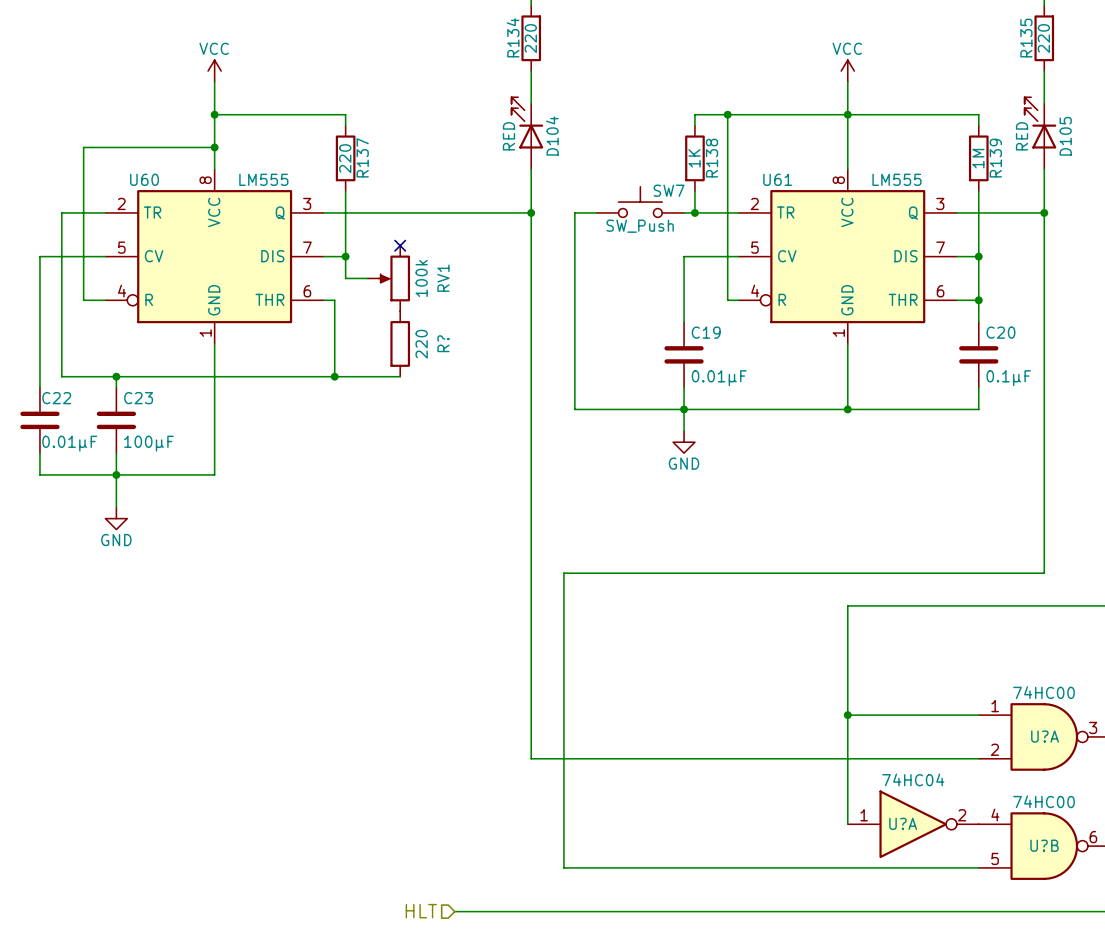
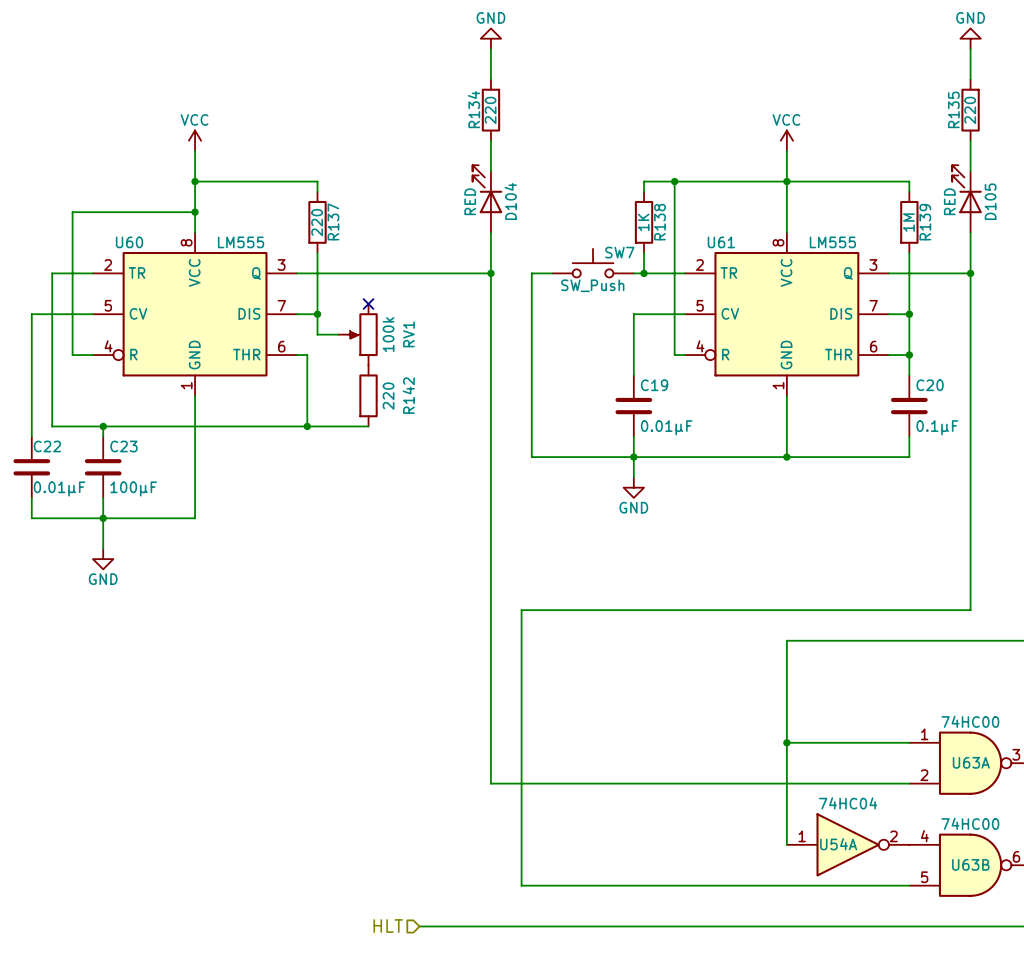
R? name: R? (443, 343) -> R142 (408, 395)
U?A name: U?A (1045, 736) -> U63A (971, 762)
U?A name: U?A (903, 823) -> U54A (838, 844)
U?B name: U?B (1044, 845) -> U63B (970, 864)

